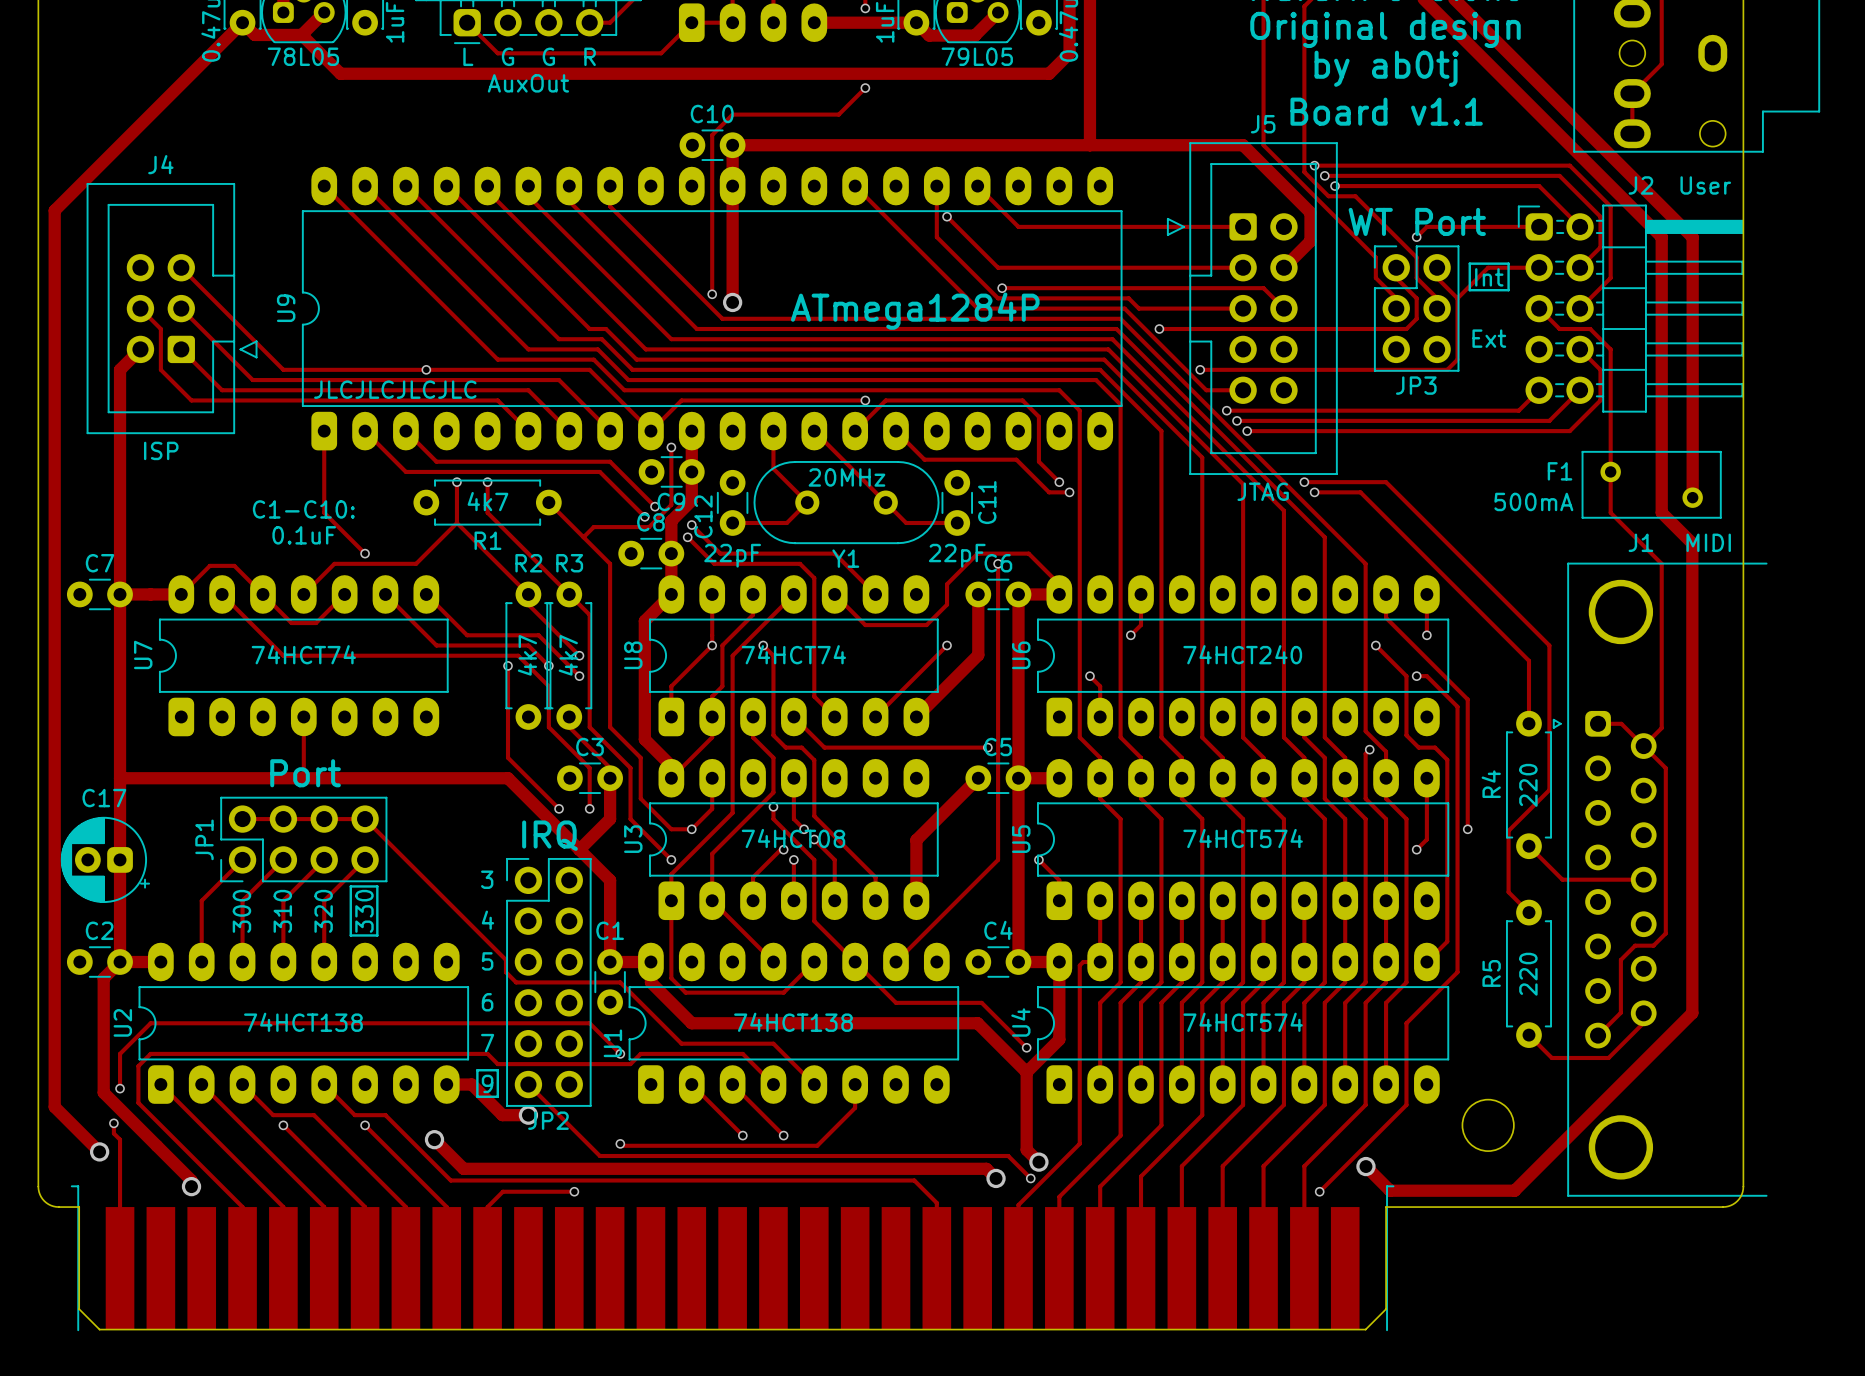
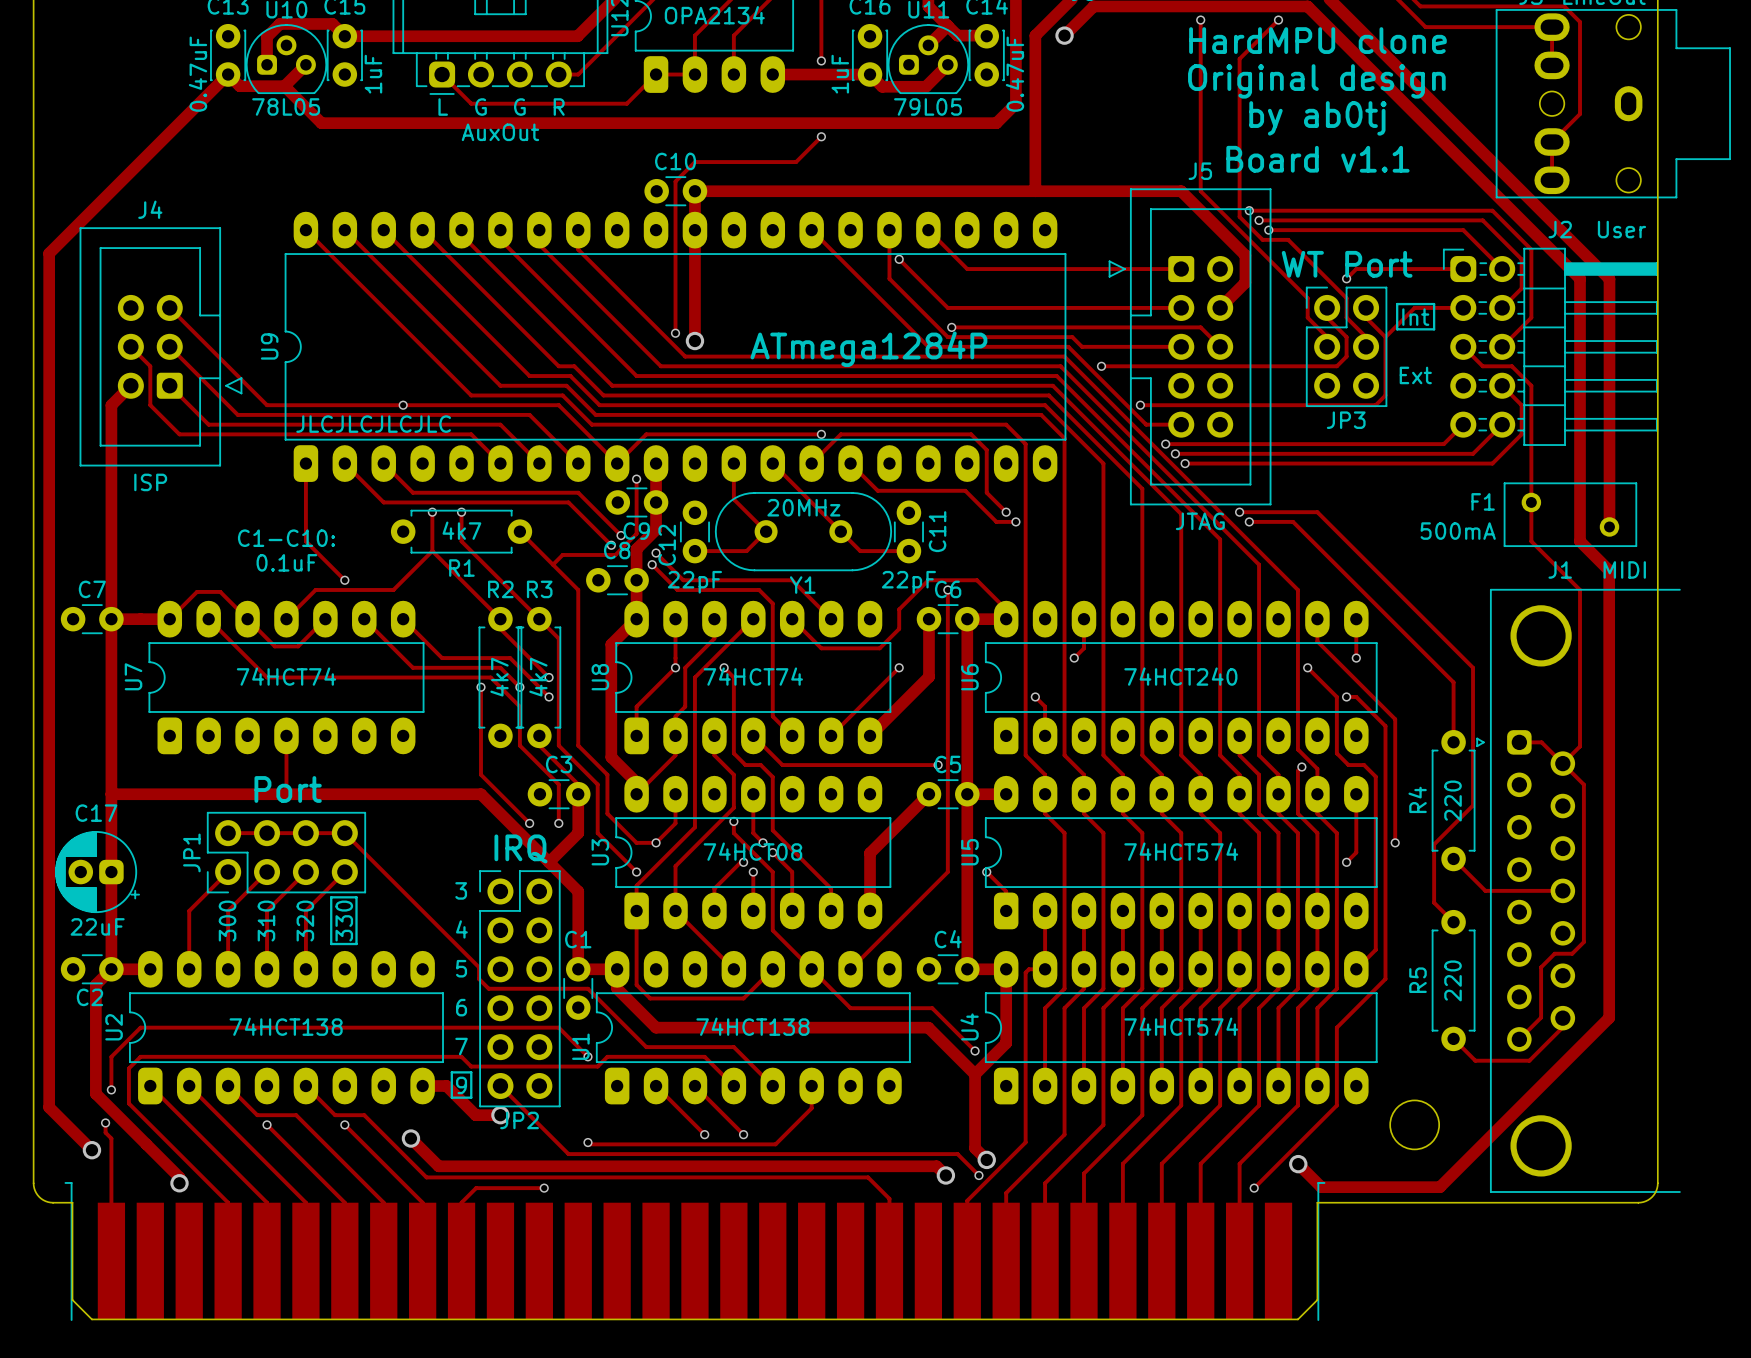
C17 value: none -> 22uF (97, 926)
C2 name position: C2 (99, 930) -> C2 (89, 997)

